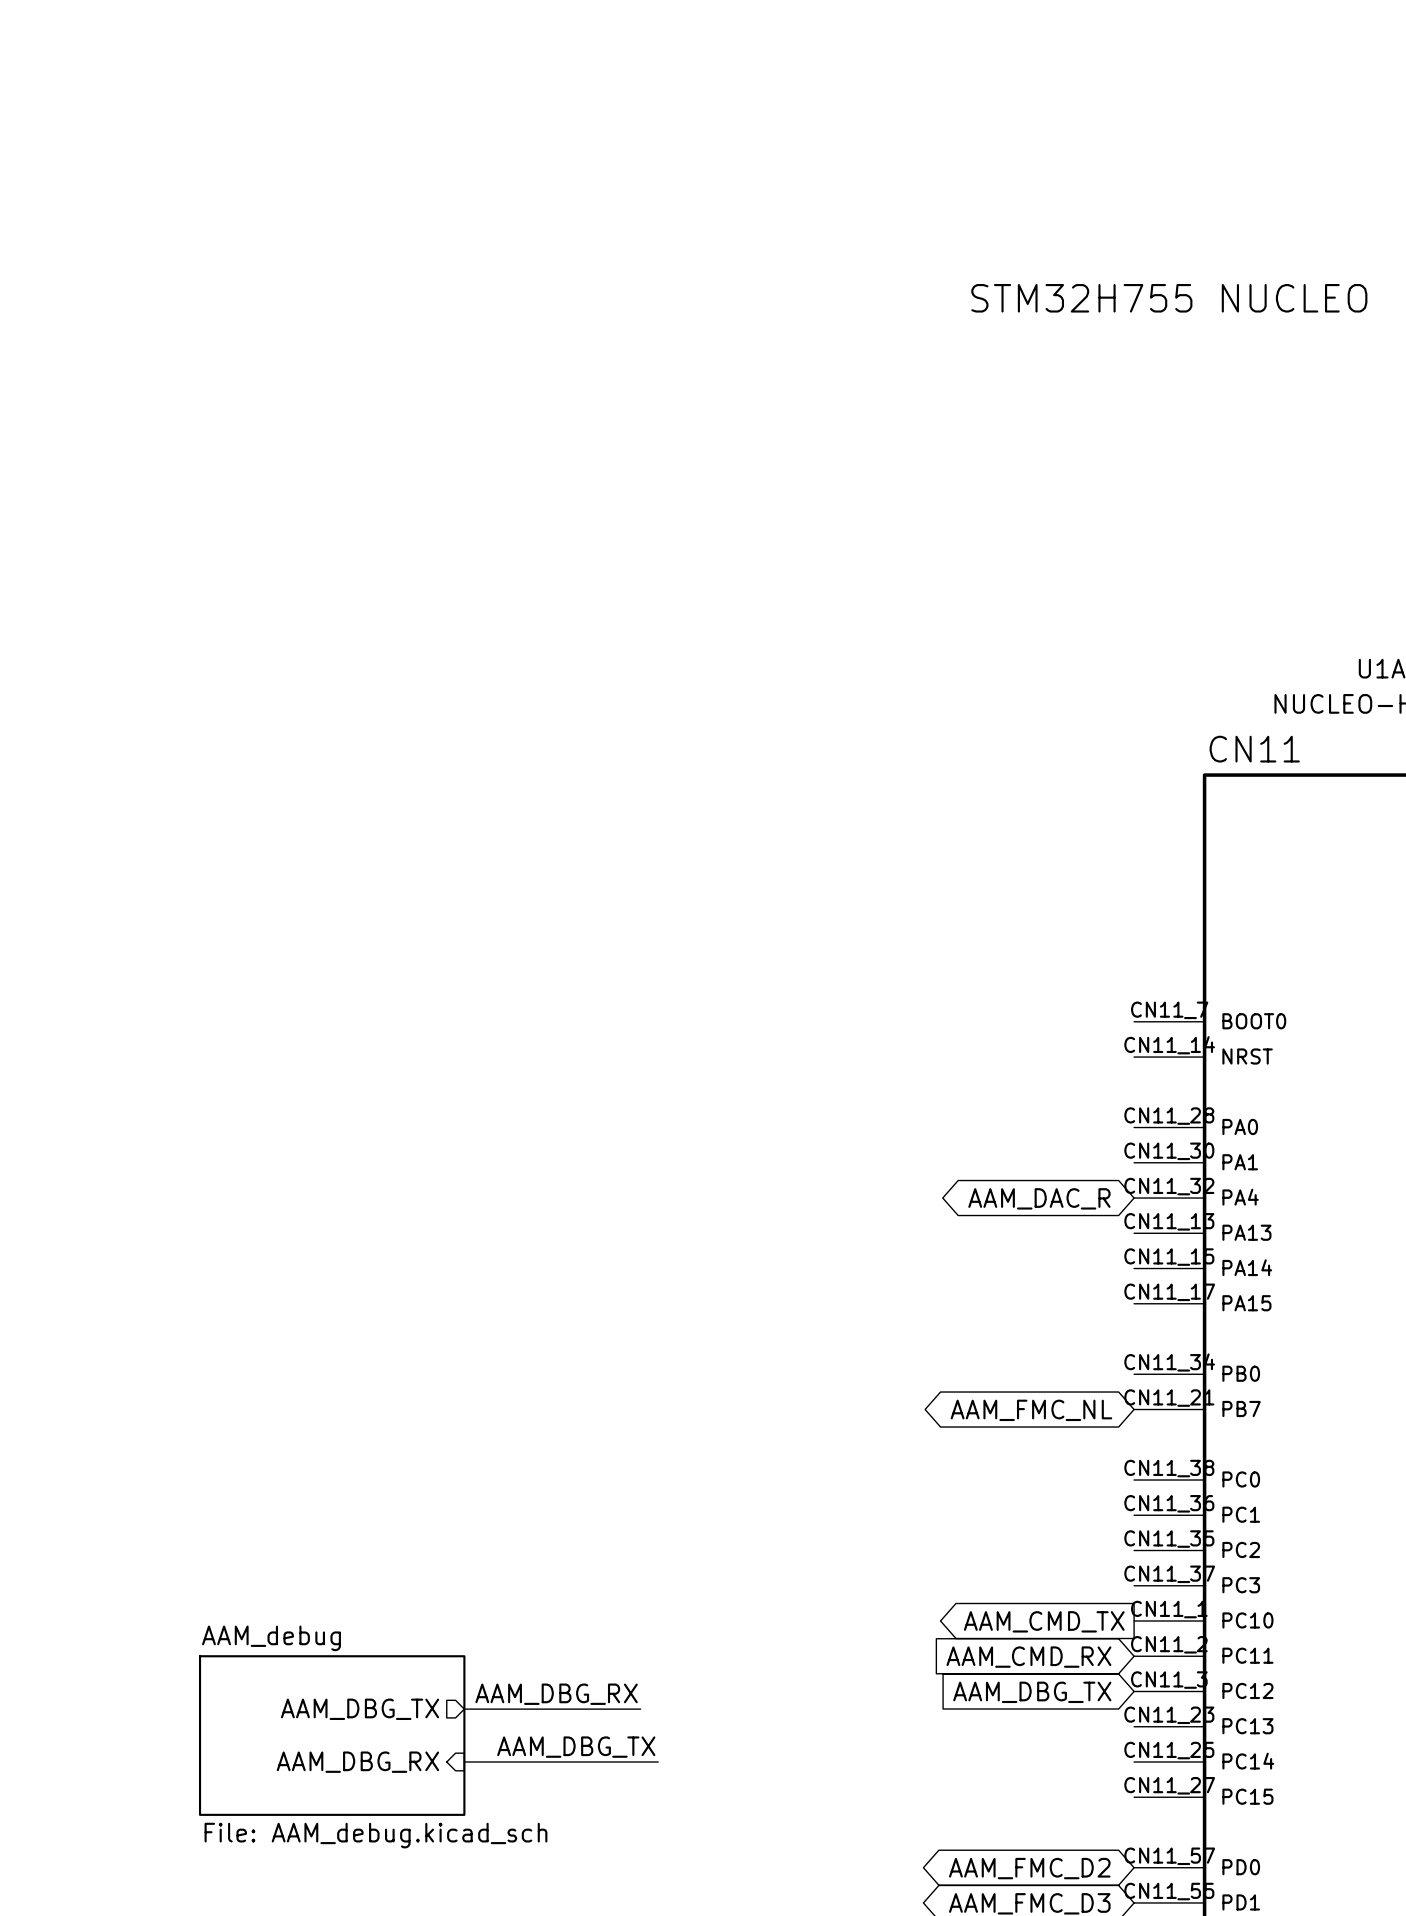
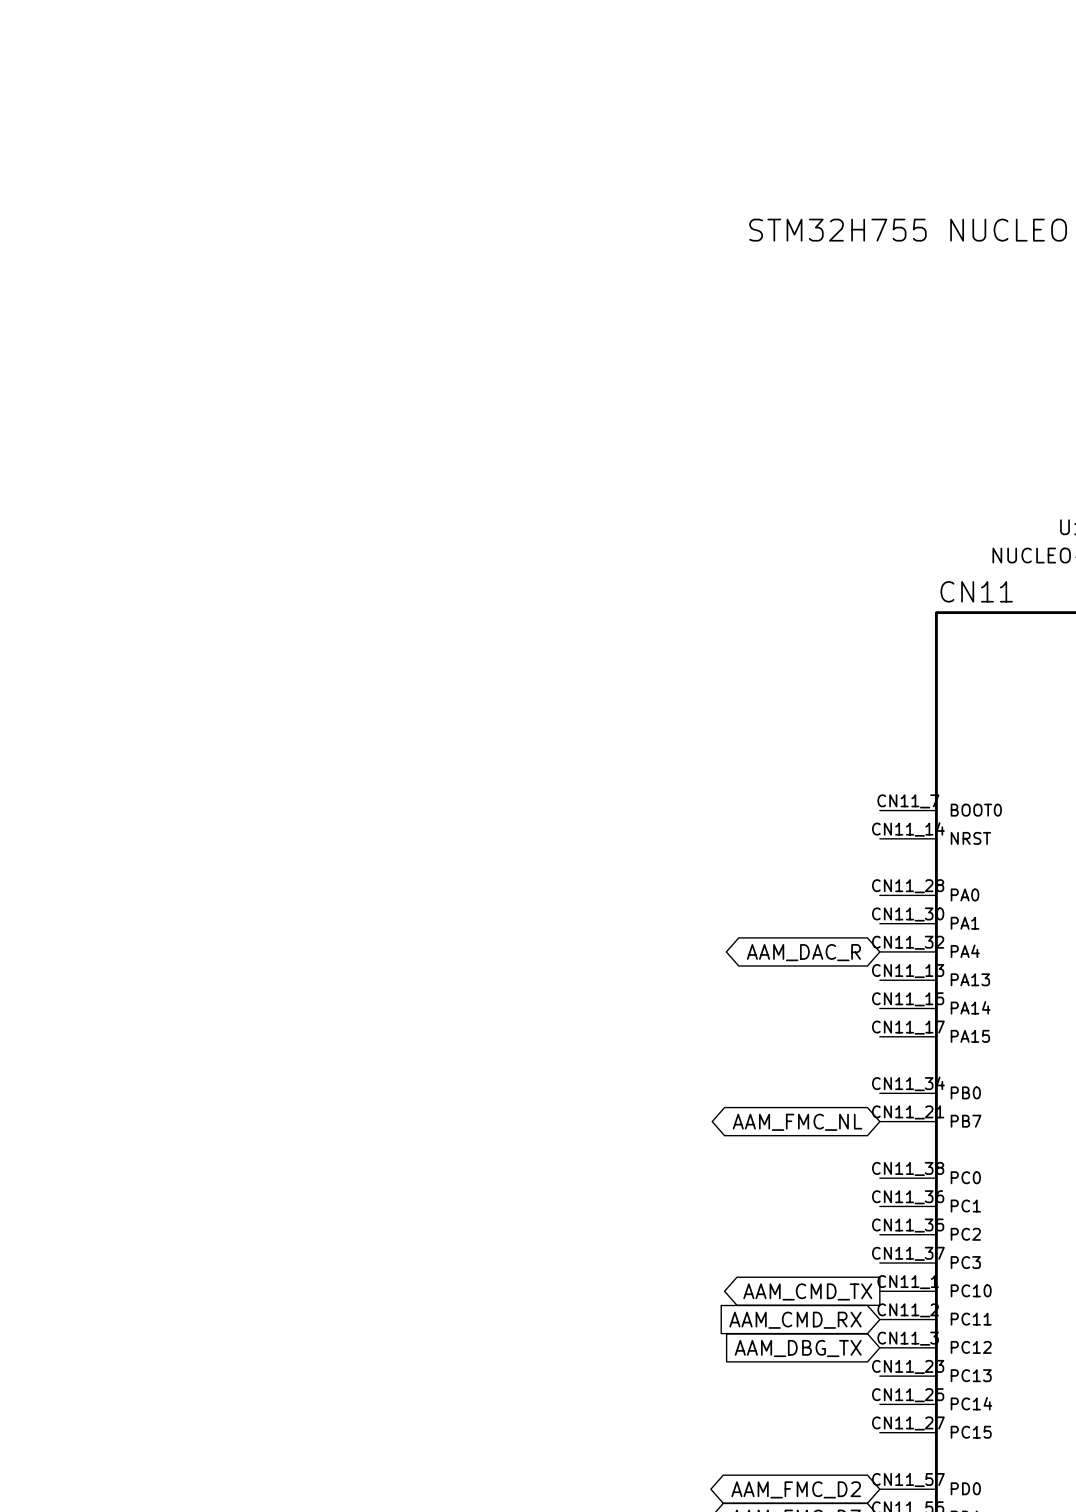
label: AAM_DBG_RX (556, 1694) -> none
sheet pin: AAM_DBG_TX (360, 1709) -> none
wire: (464, 1709) (640, 1709) -> none
sheet AAM_debug: File: AAM_debug.kicad_sch (332, 1735) -> none
label: AAM_DBG_TX (576, 1747) -> none
wire: (464, 1761) (658, 1761) -> none
sheet pin: AAM_DBG_RX (357, 1762) -> none

